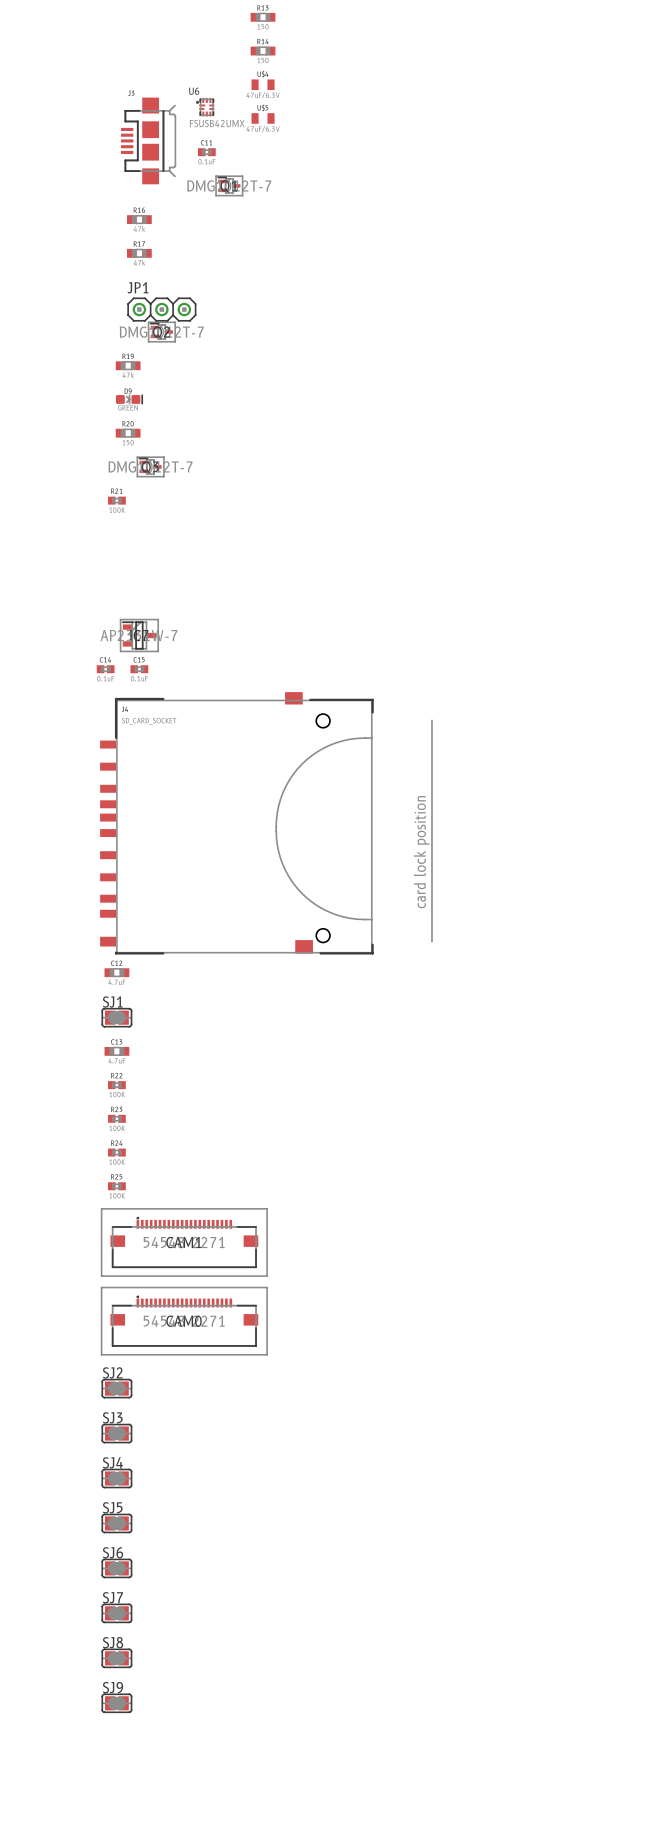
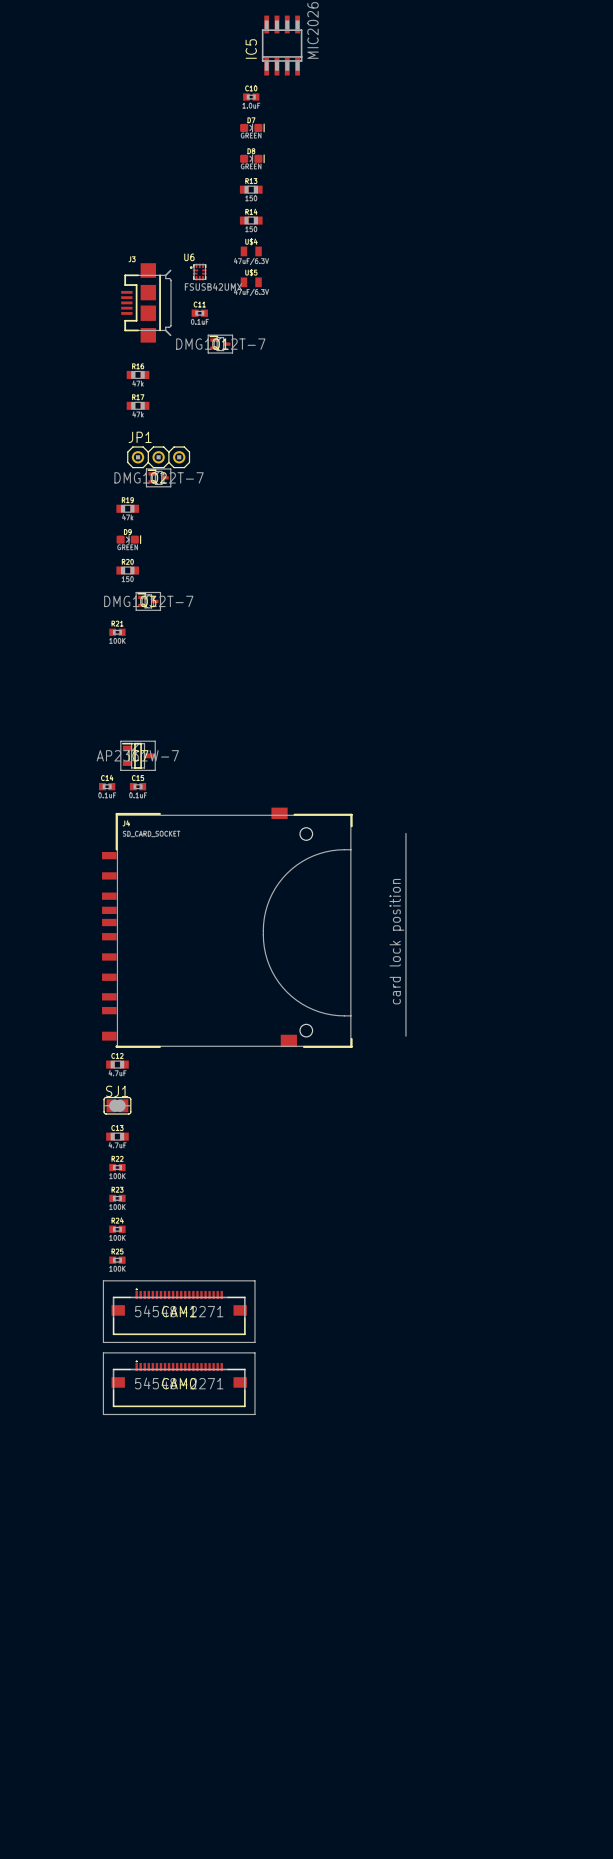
SJ2: (116, 1388) -> none
SJ3: (116, 1433) -> none
SJ4: (116, 1478) -> none
SJ5: (116, 1523) -> none
SJ6: (116, 1568) -> none
SJ7: (116, 1613) -> none
SJ8: (116, 1658) -> none
SJ9: (116, 1703) -> none

